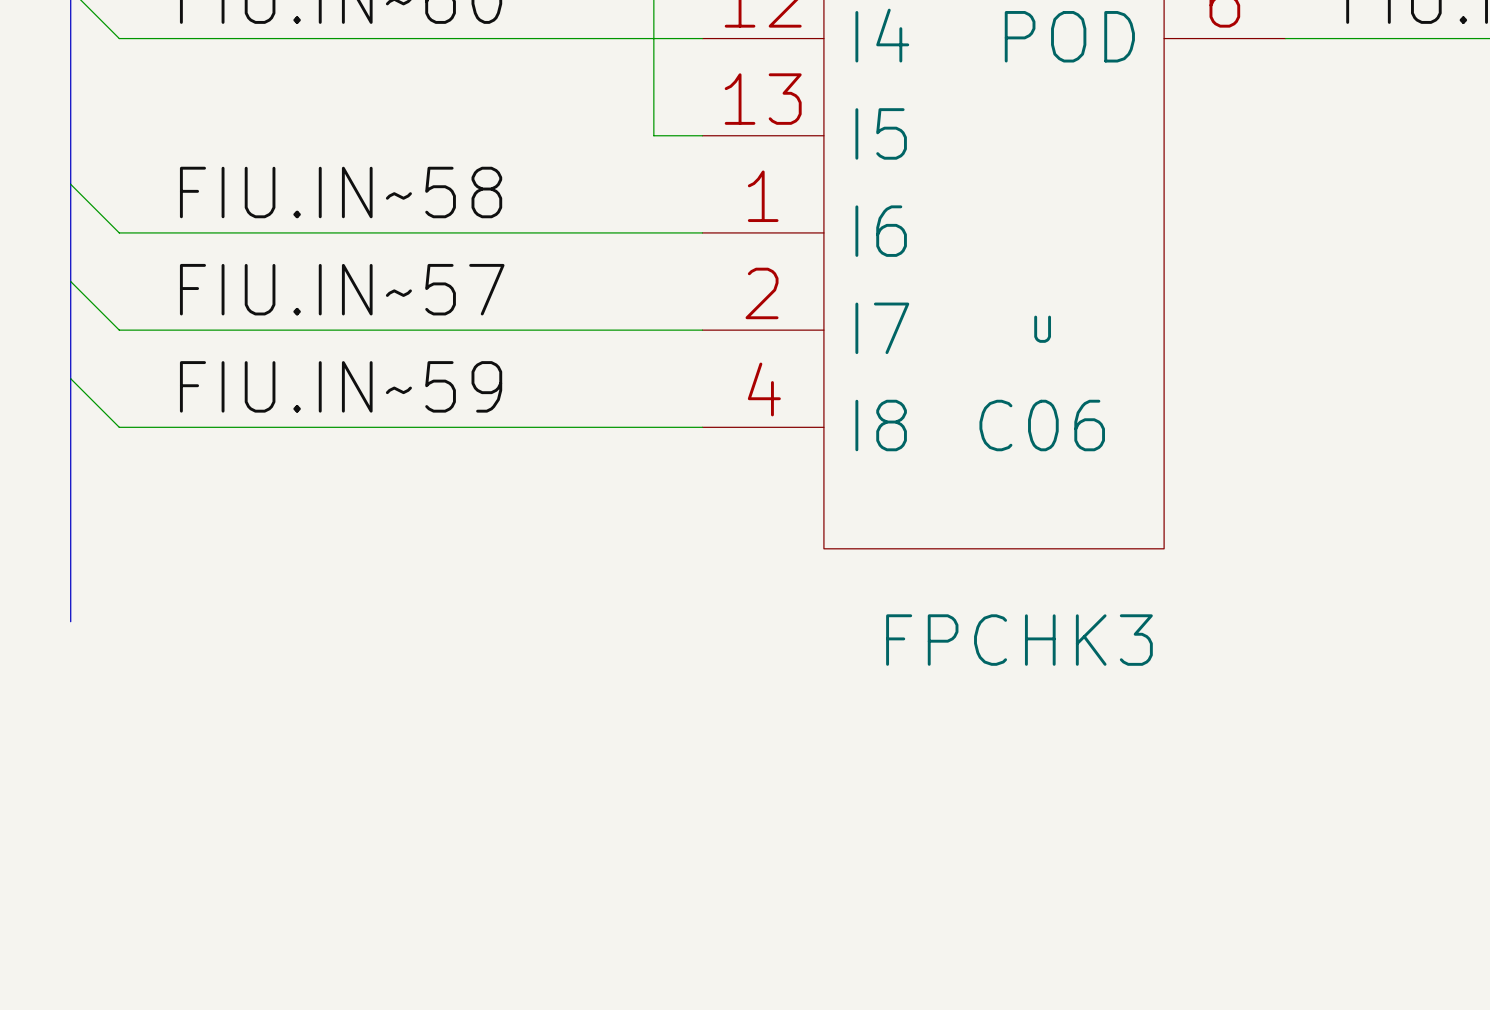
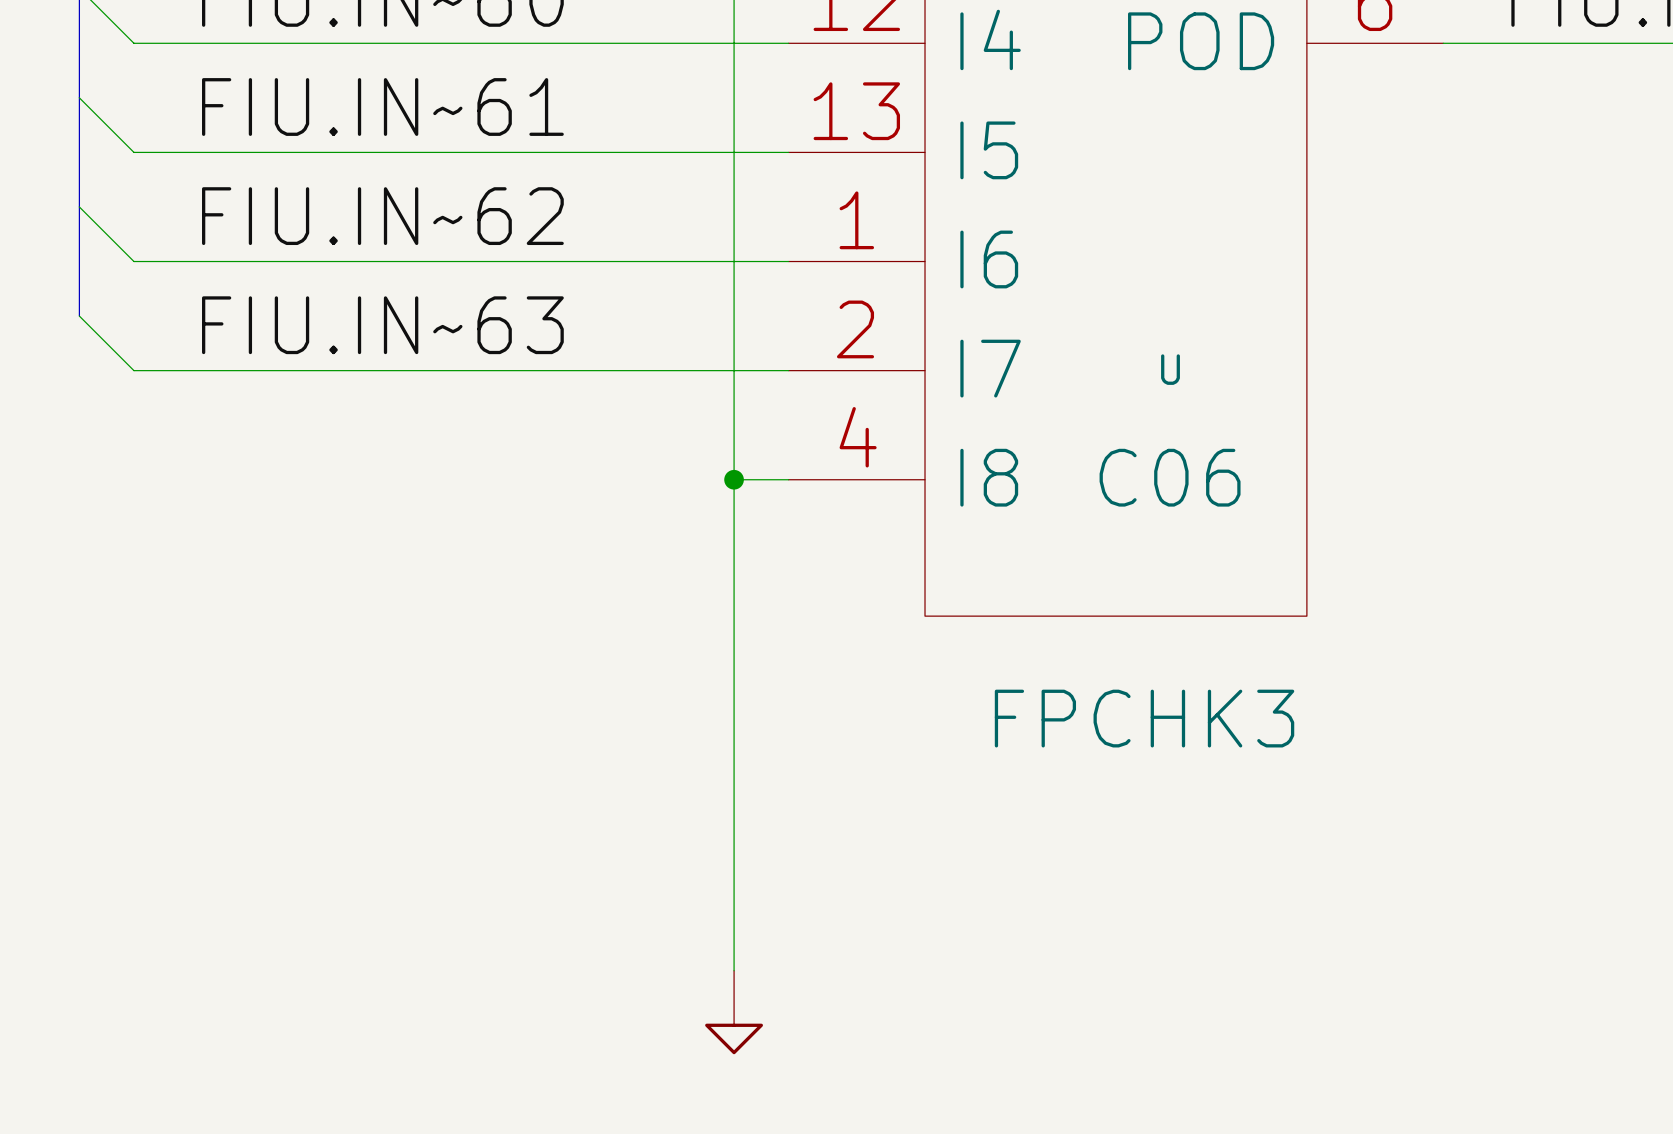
wire: none -> (79, 97) (133, 152) (734, 152) (734, 970)
label: none -> FIU.IN~61 (382, 107)
label: FIU.IN~58 (341, 192) -> FIU.IN~62 (382, 216)
bus: (70, 281) (70, 621) -> none
label: FIU.IN~57 (342, 289) -> FIU.IN~63 (382, 325)
wire: (70, 378) (119, 427) (653, 427) -> none
label: FIU.IN~59 (341, 386) -> none
junction: none -> (734, 479)
power symbol: none -> (734, 1012)

